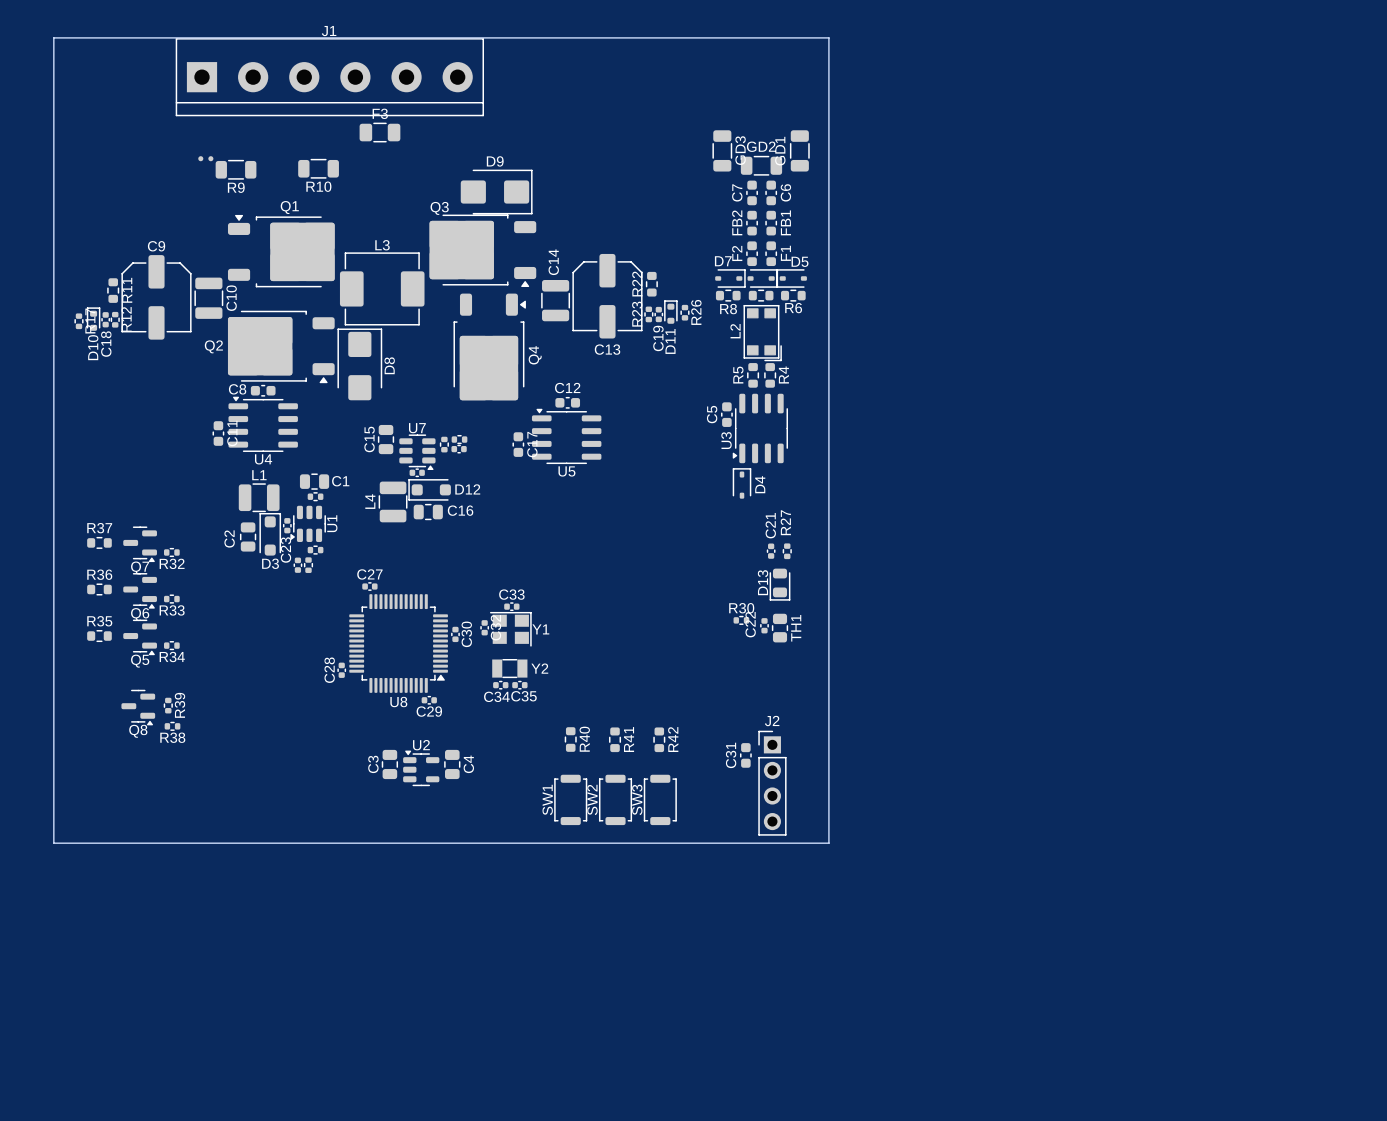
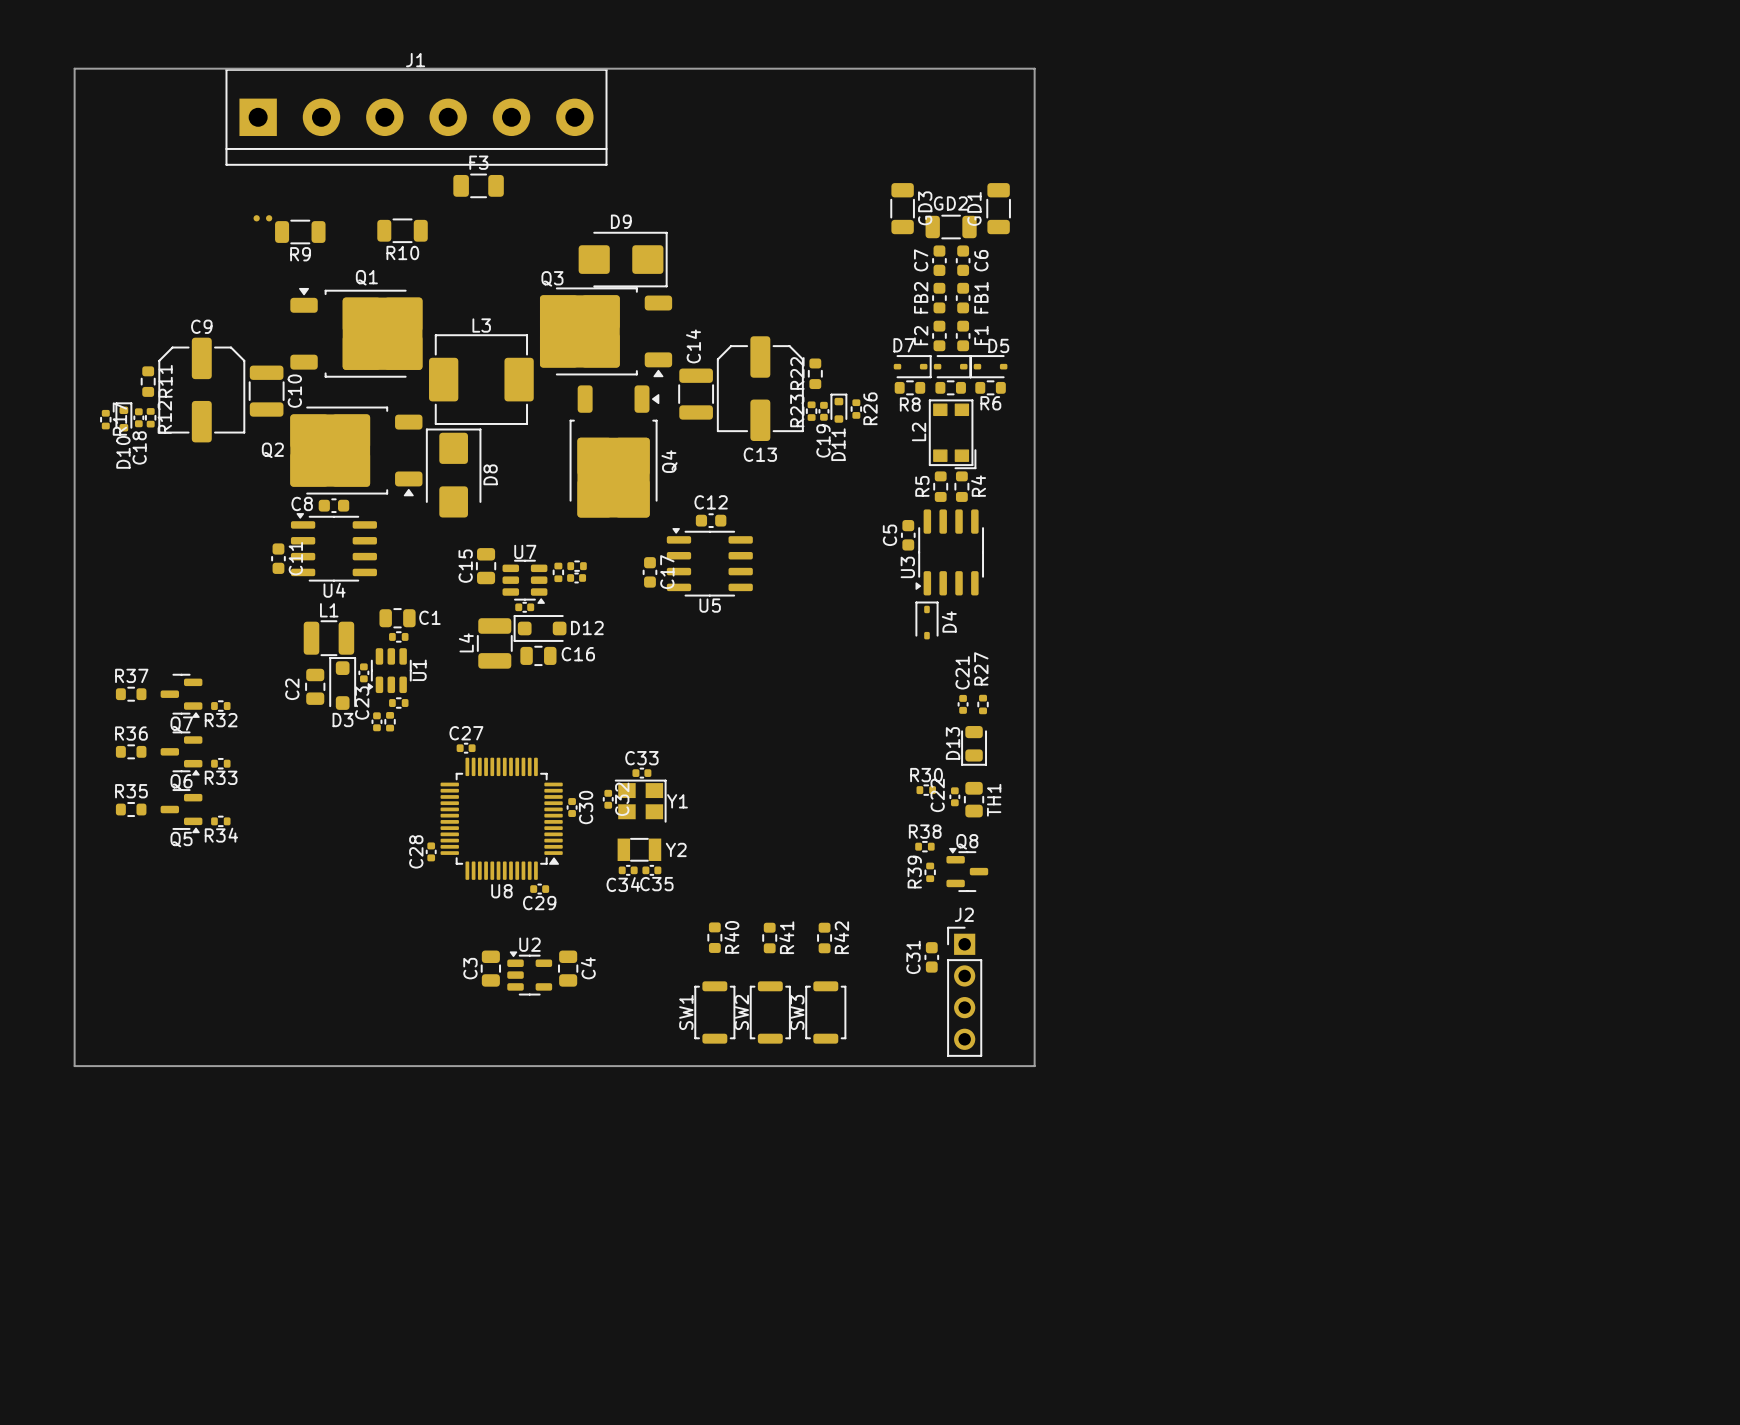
R39 position: (168, 705) -> (930, 872)
R39 name position: R39 (179, 705) -> R39 (914, 872)
Q8 rotation: 0° (138, 707) -> 180° (967, 869)
Q8 position: (138, 707) -> (967, 869)
R38 position: (172, 726) -> (924, 846)
R38 name position: R38 (172, 737) -> R38 (925, 831)

